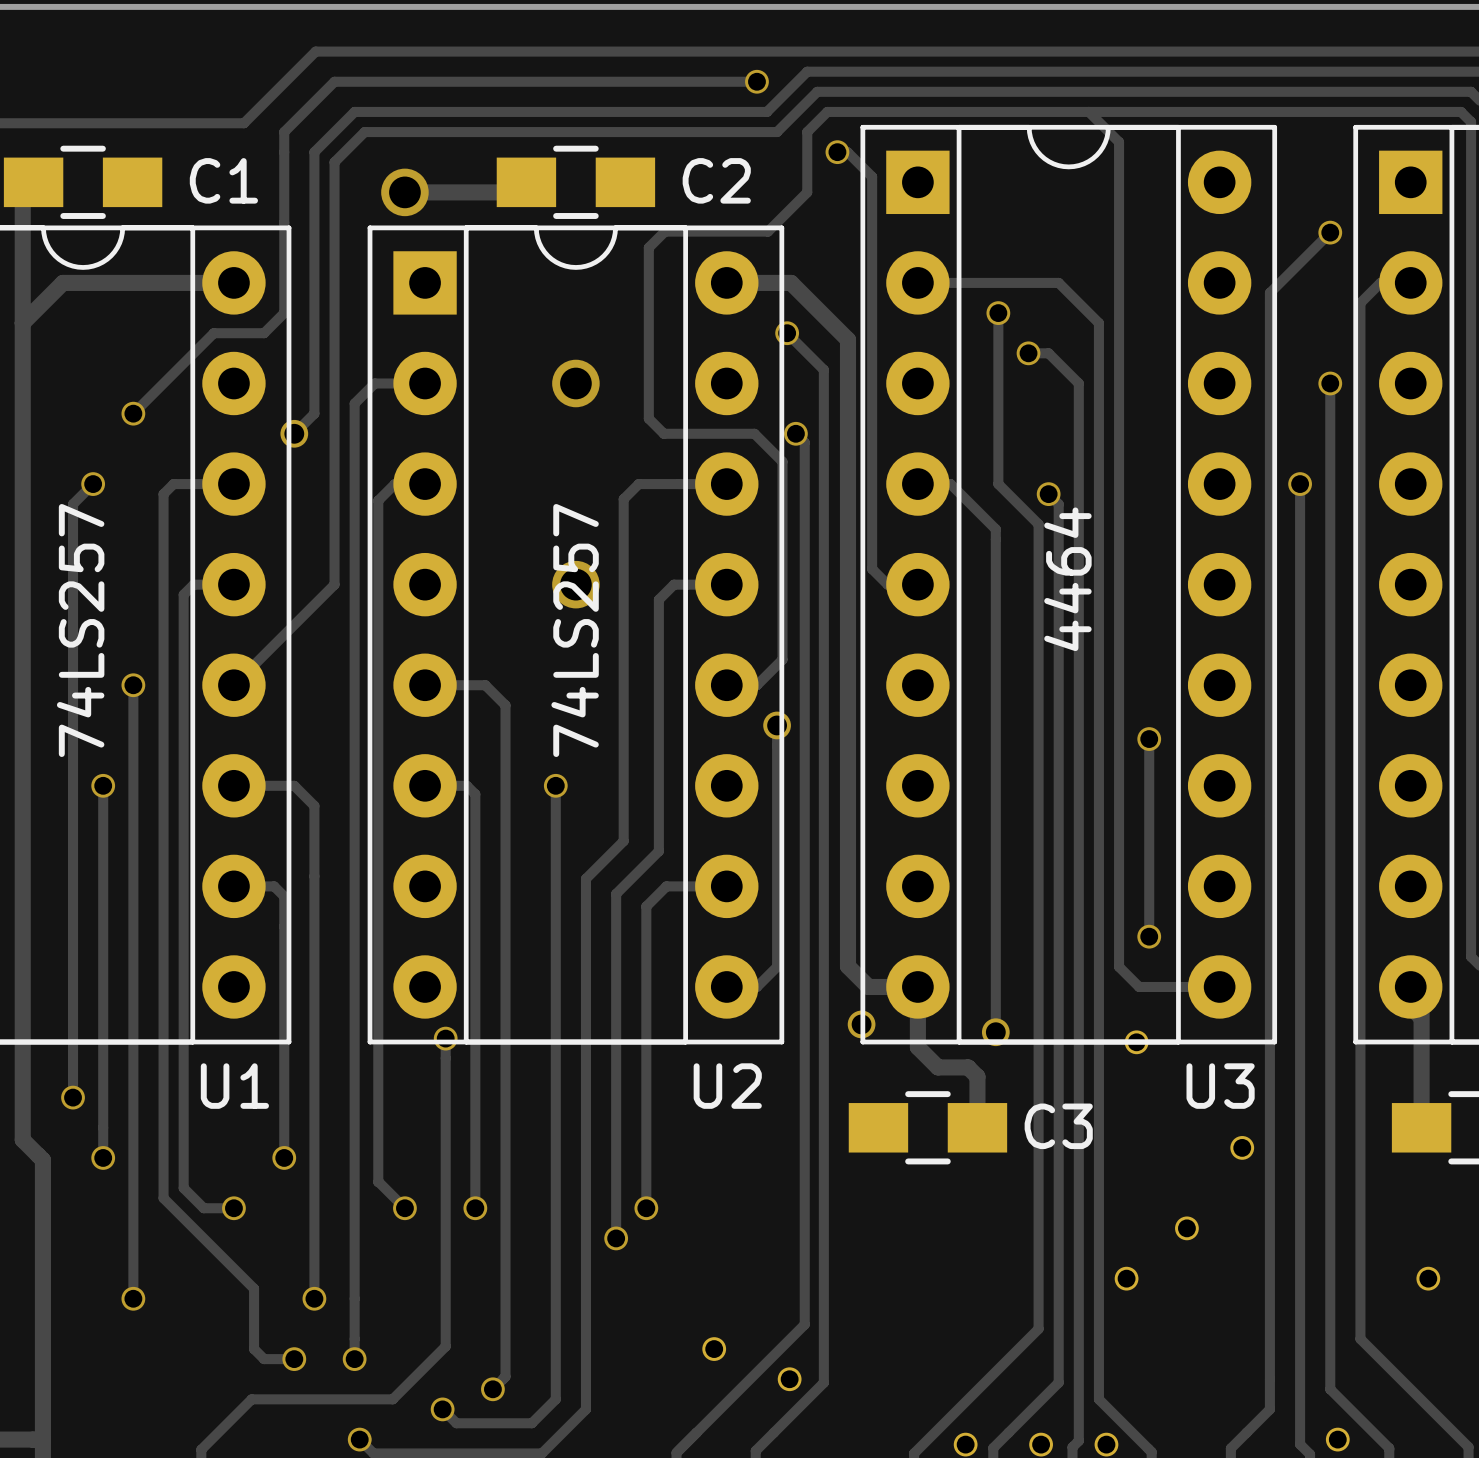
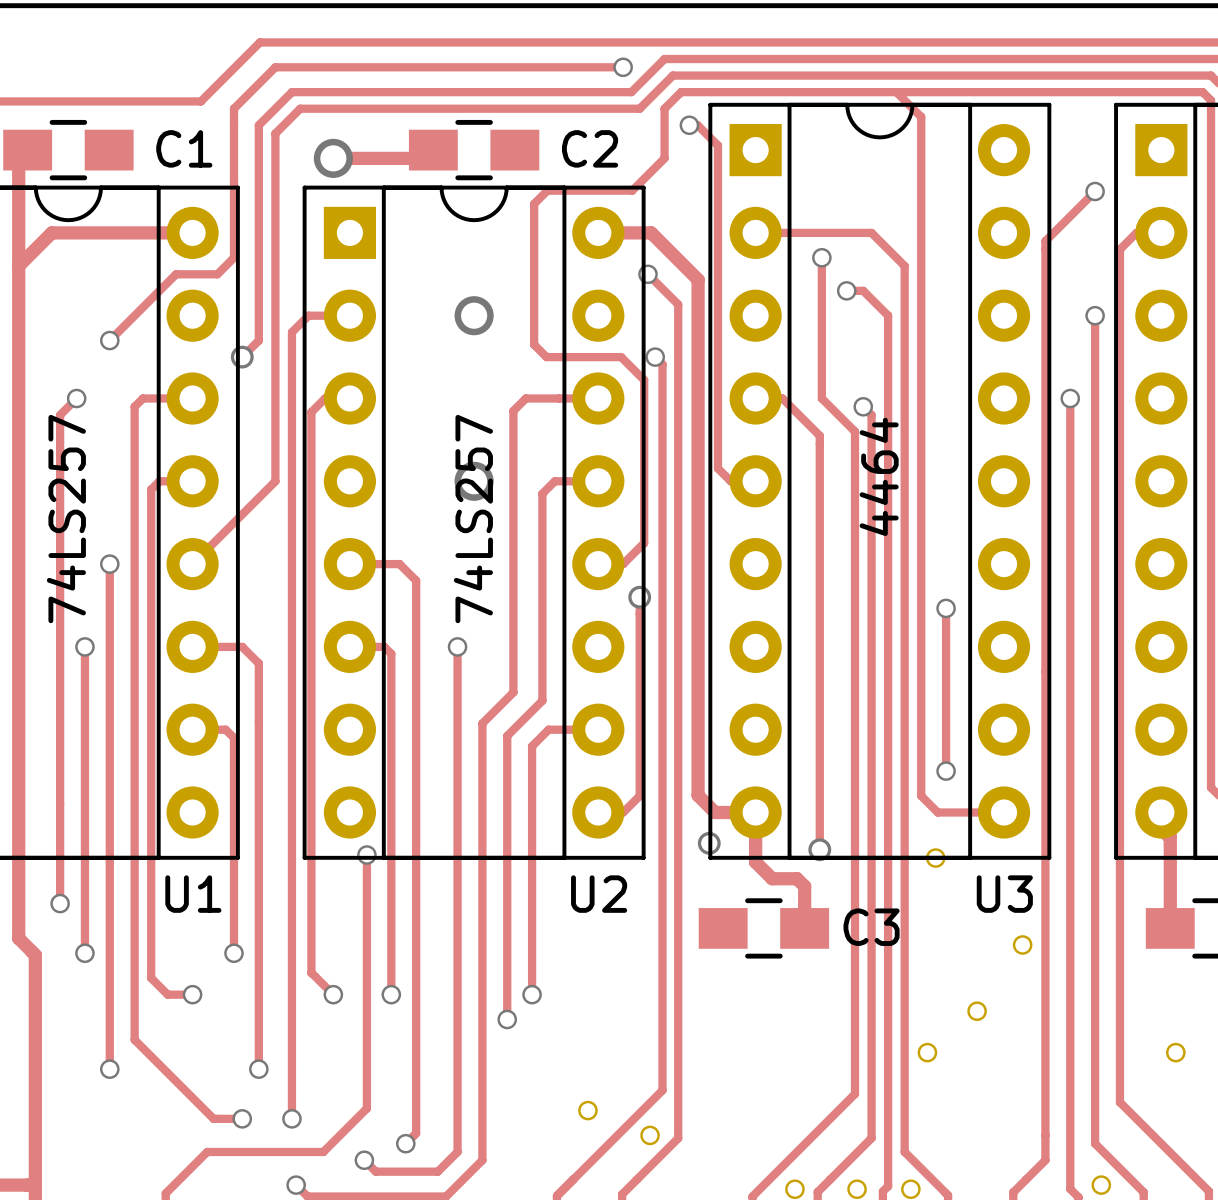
track: (163, 1198) (254, 1288) (254, 1349) (264, 1359) -> (134, 986) (134, 1039) (213, 1118) (217, 1118)

